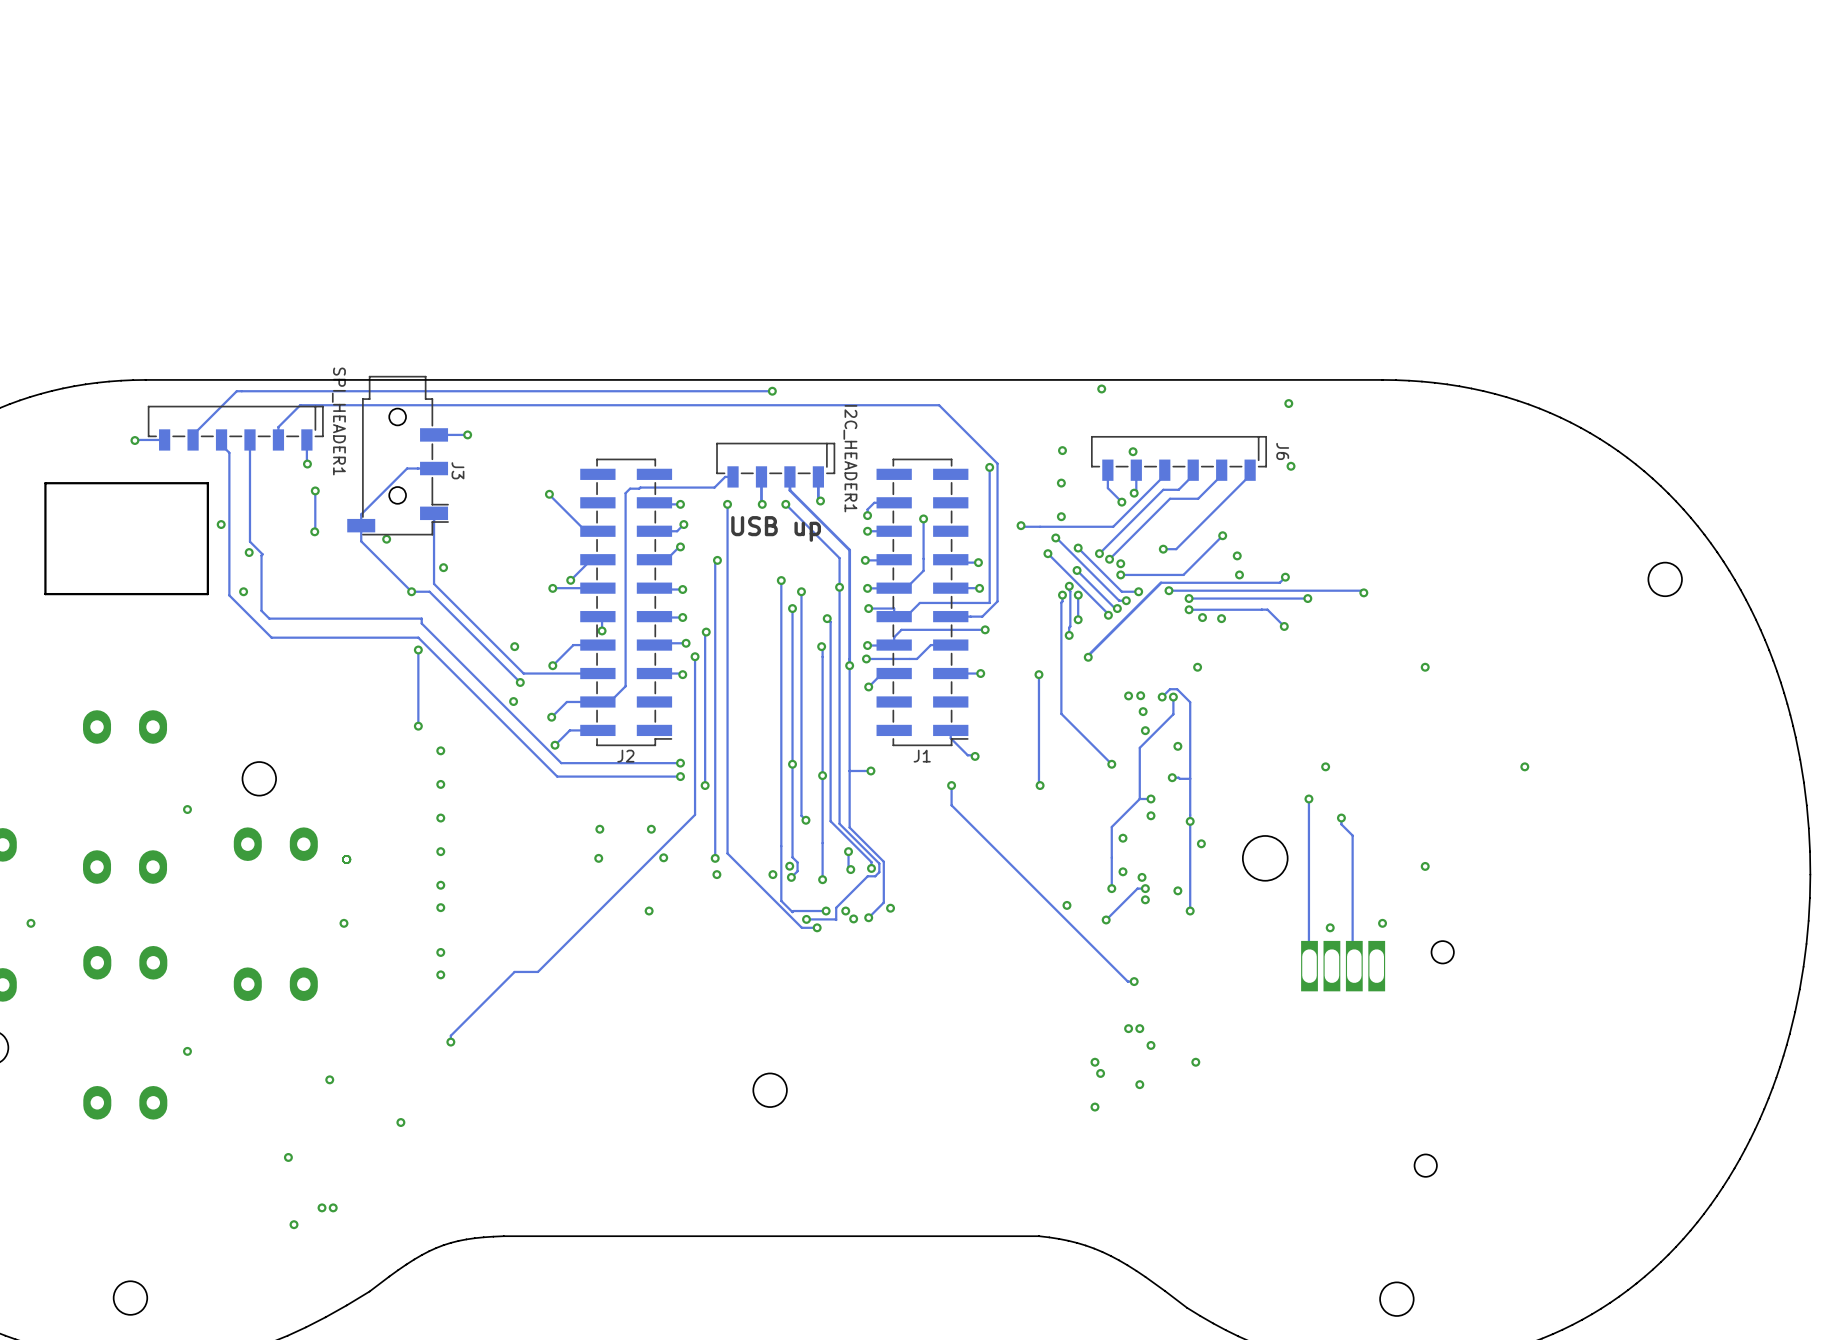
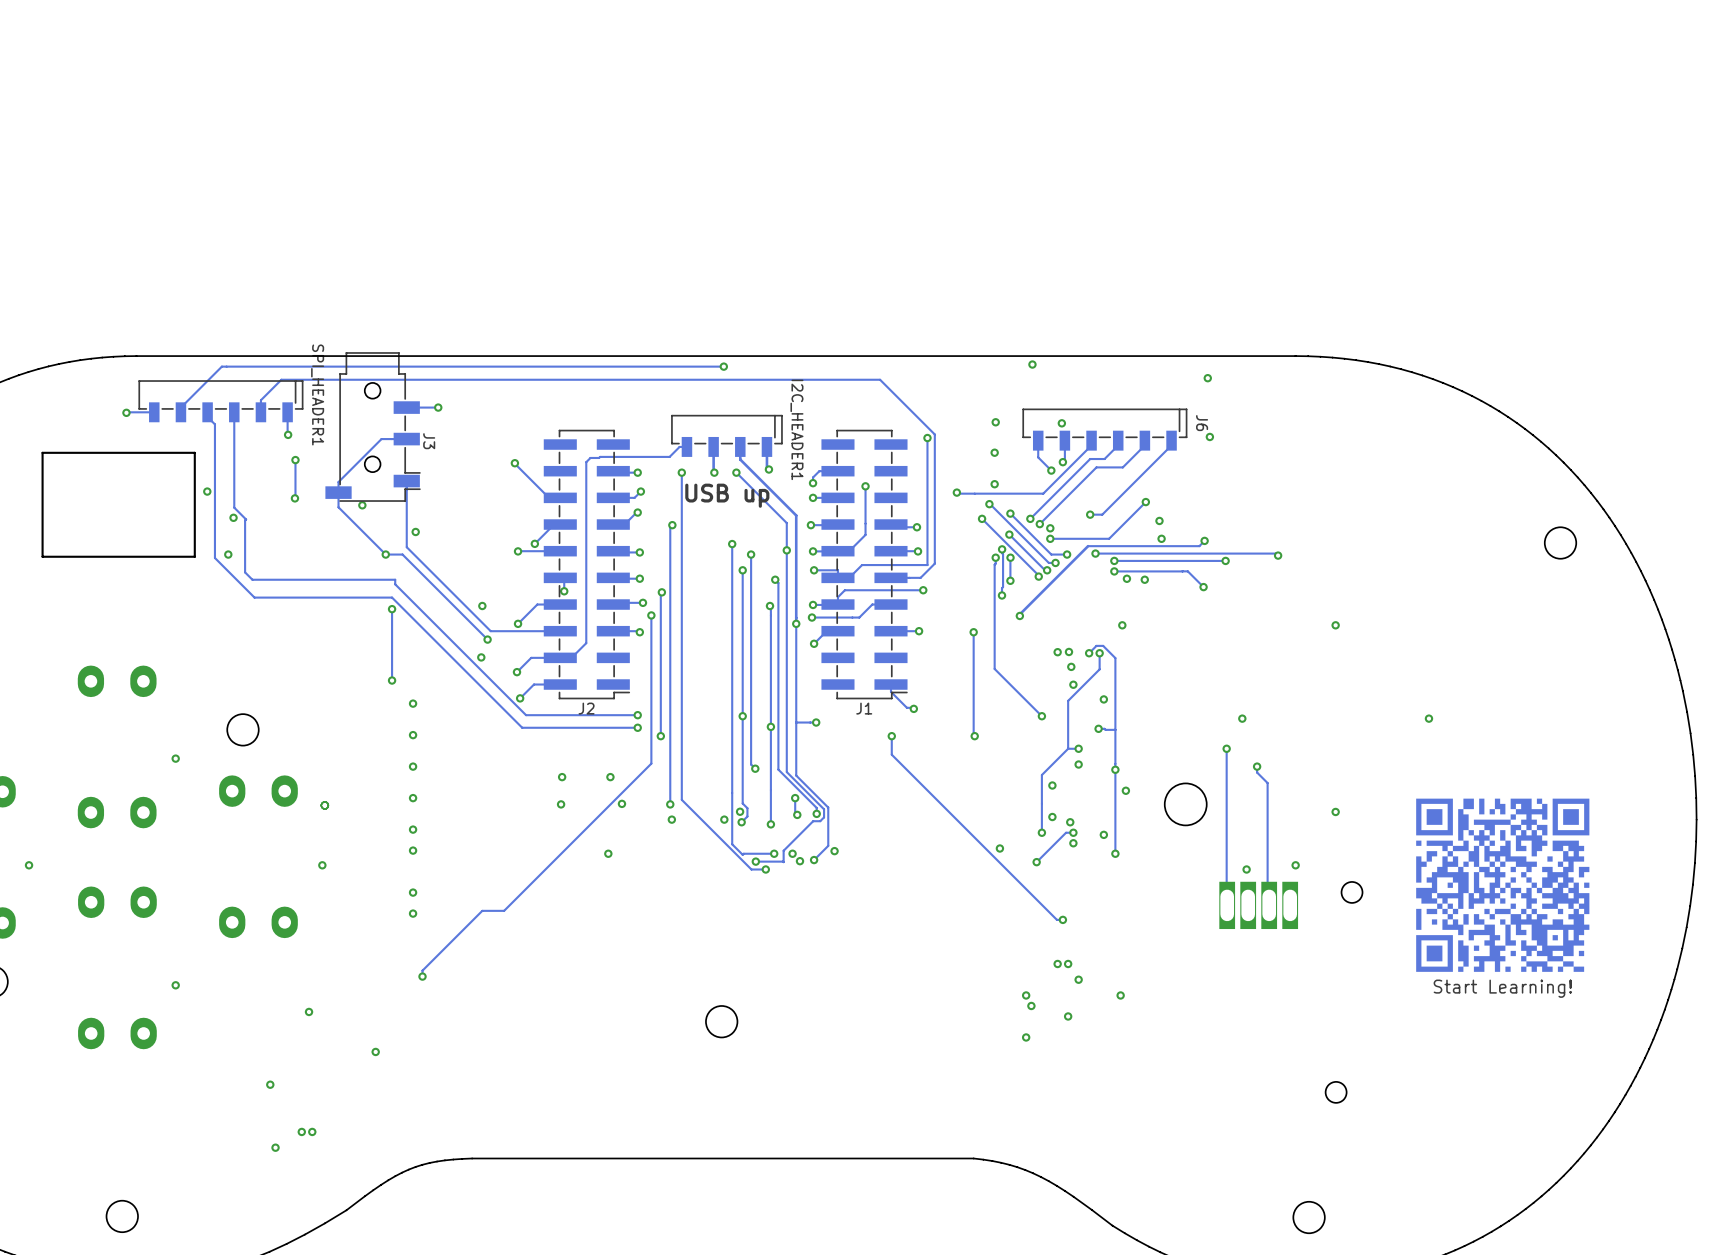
Start Learning!: none -> (1502, 885)

